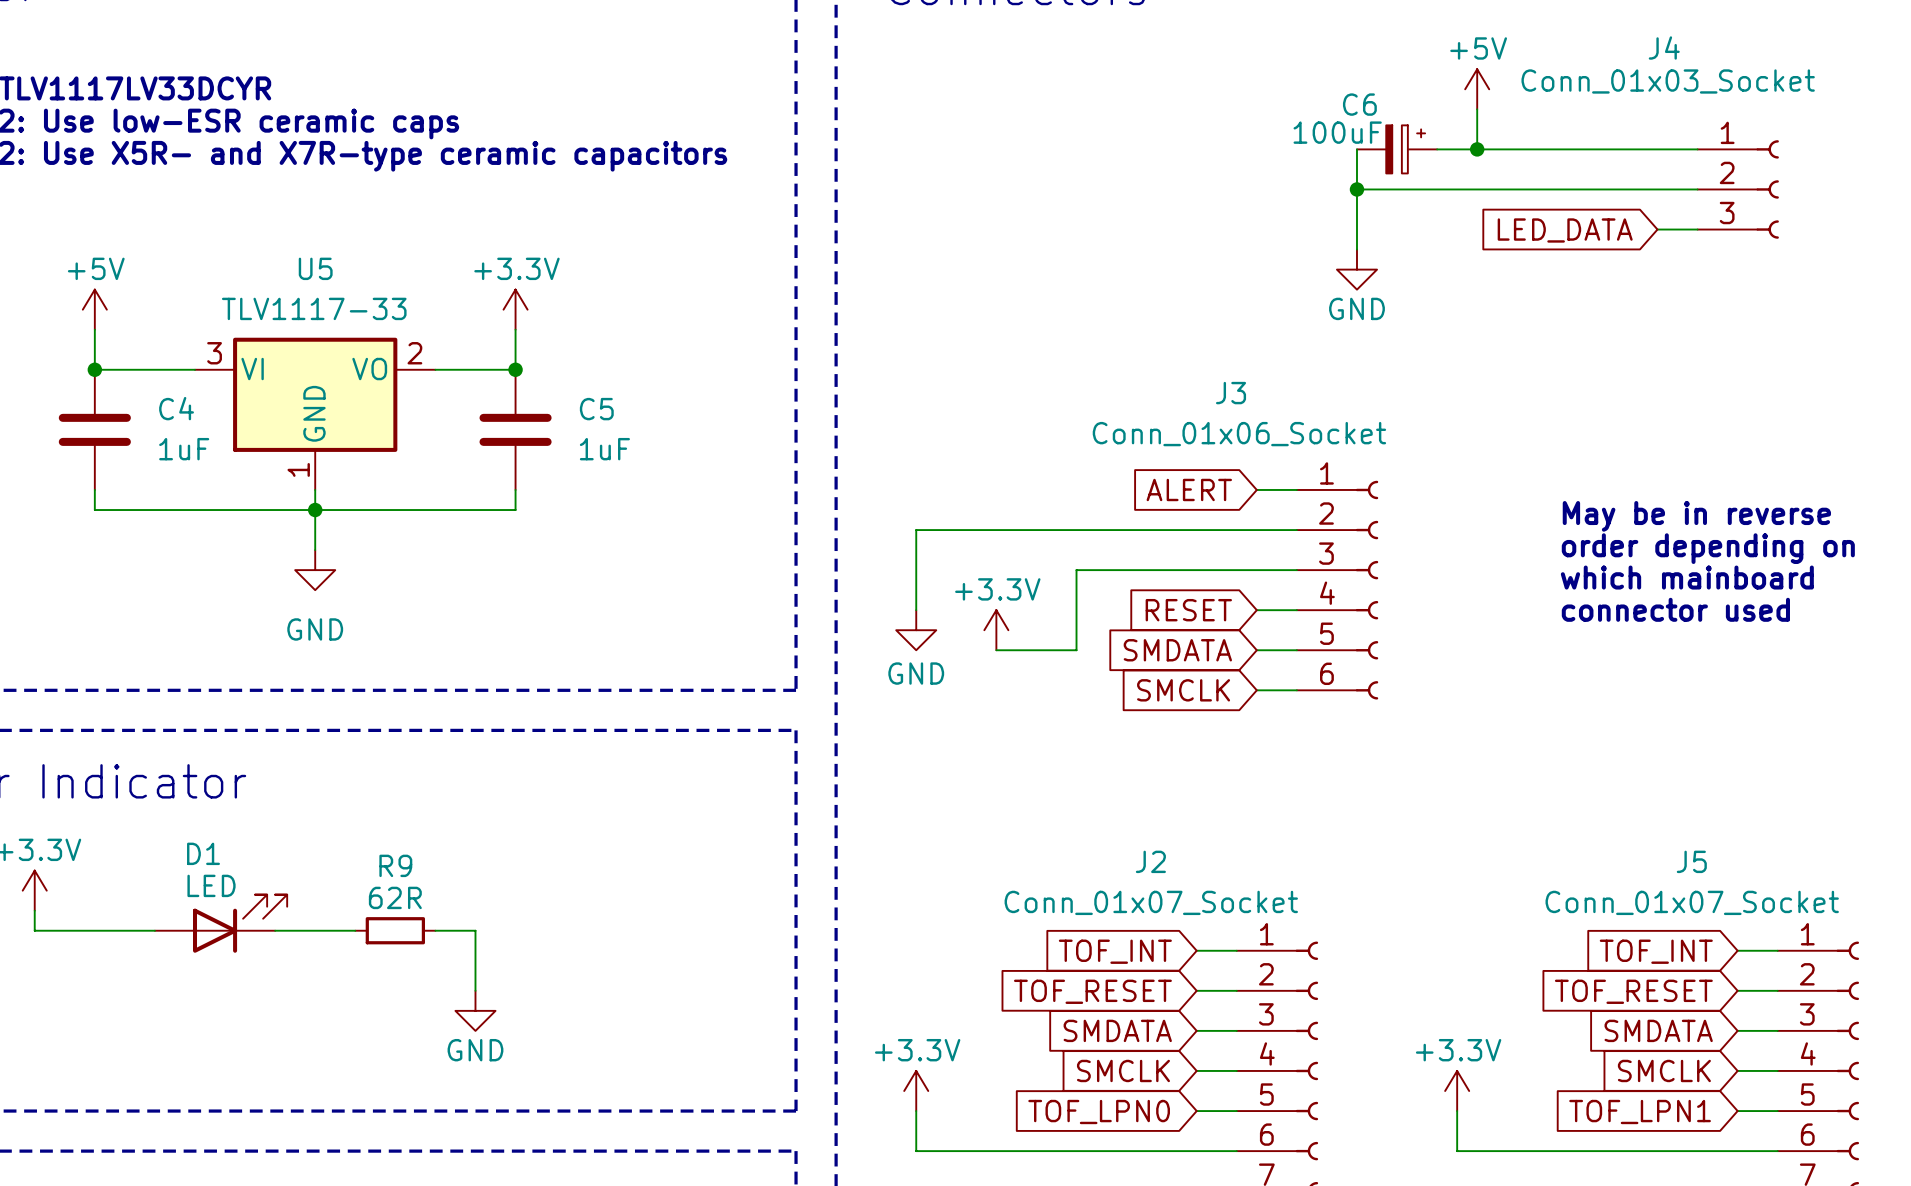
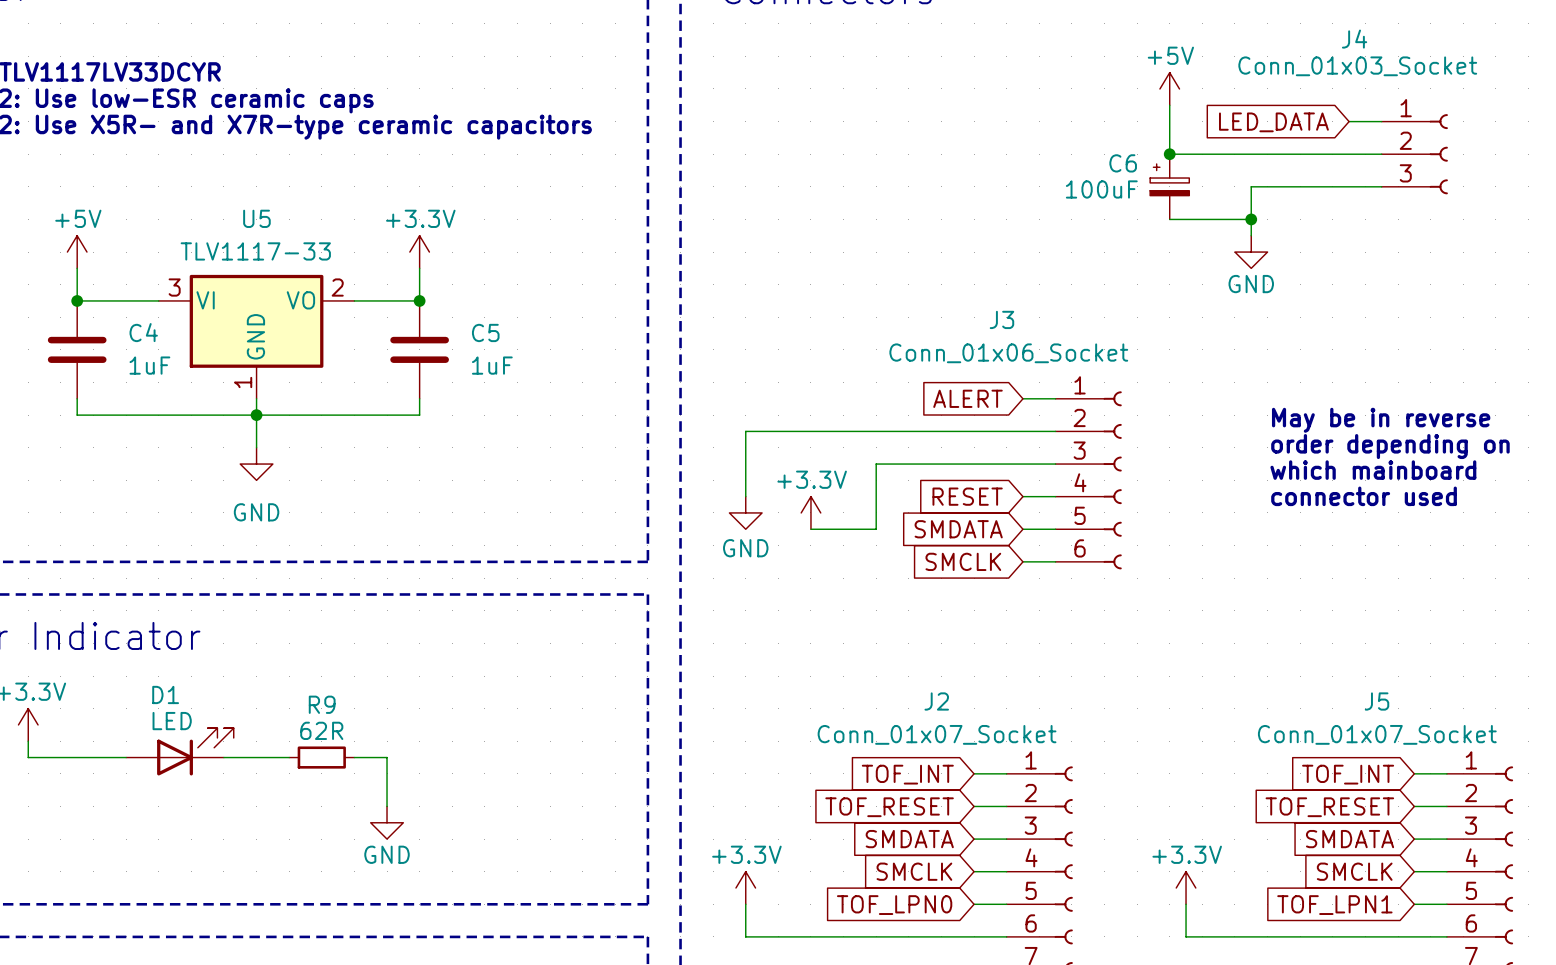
power symbol position: +5V (1477, 89) -> +5V (1169, 88)
wire: (1477, 109) (1477, 149) -> none
wire: (1356, 149) (1356, 249) -> none
C6 position: (1397, 149) -> (1169, 186)
C6 rotation: 0° (1405, 149) -> 90° counterclockwise (1169, 179)
wire: (1437, 149) (1657, 149) -> none
junction: (1477, 149) -> none
wire: (1356, 189) (1437, 189) -> (1169, 105) (1169, 154)
junction: (1356, 189) -> none
junction: none -> (1169, 154)
wire: none -> (1349, 186) (1251, 186) (1251, 235)
global label position: LED_DATA (1565, 230) -> LED_DATA (1273, 122)
power symbol position: GND (1356, 269) -> GND (1251, 252)
wire: none -> (1169, 219) (1251, 219)
junction: none -> (1251, 219)

